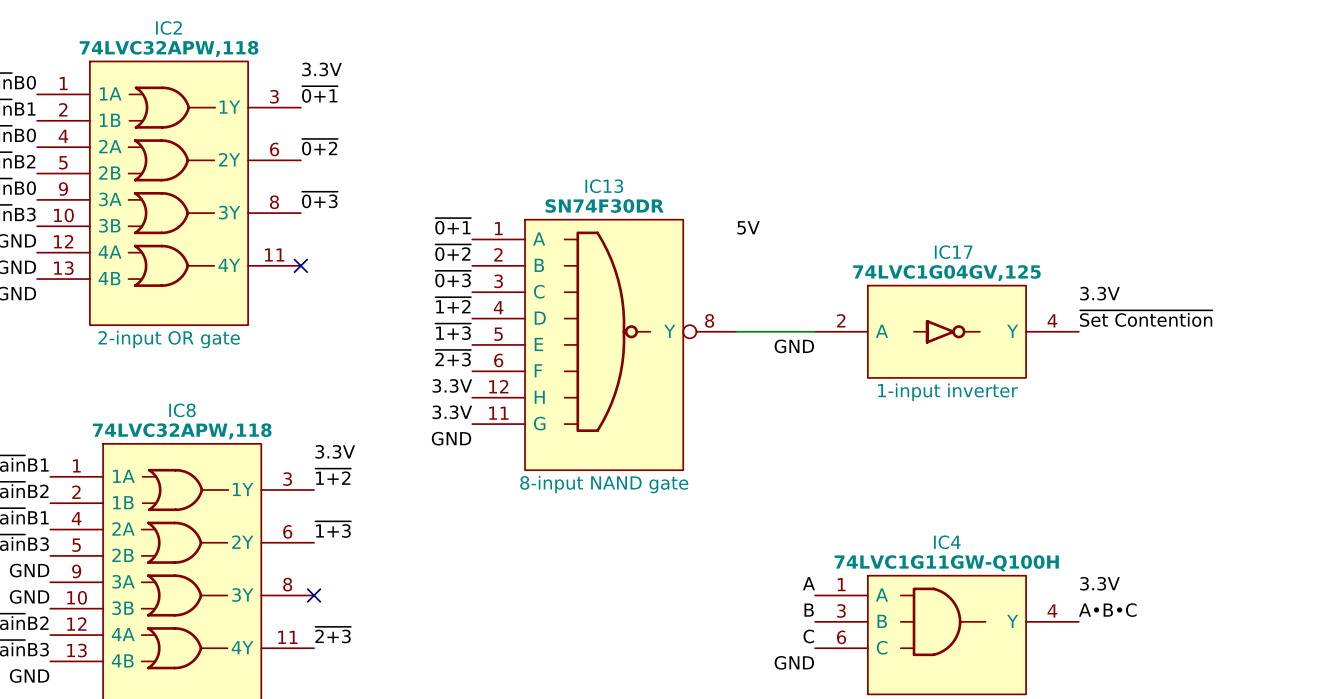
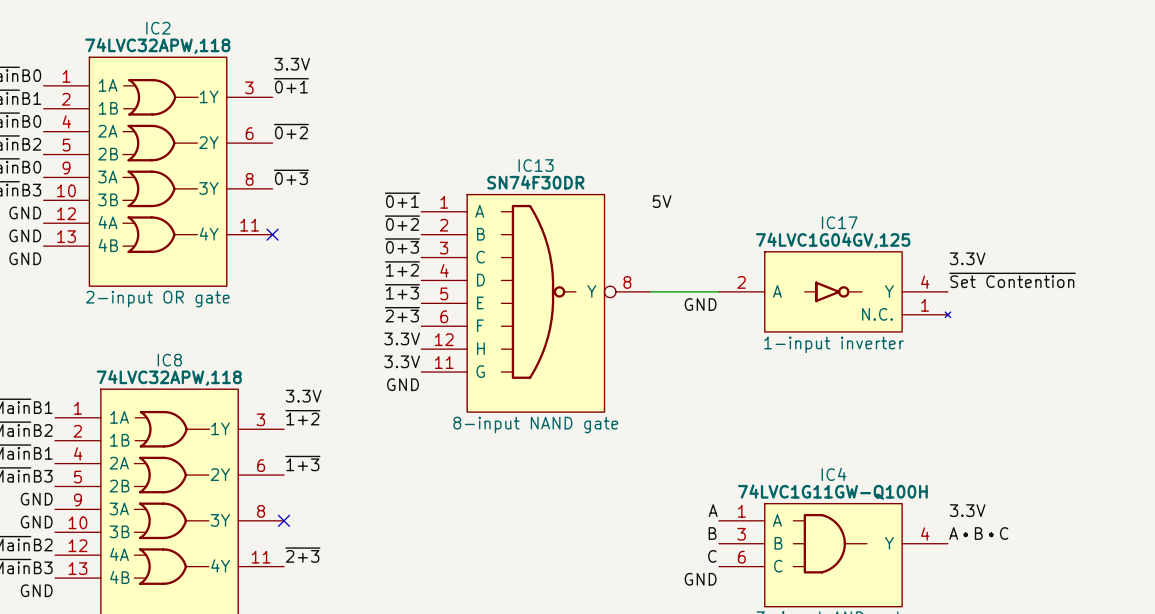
IC17 symbol: [815, 284, 1079, 379] -> [718, 251, 951, 333]

